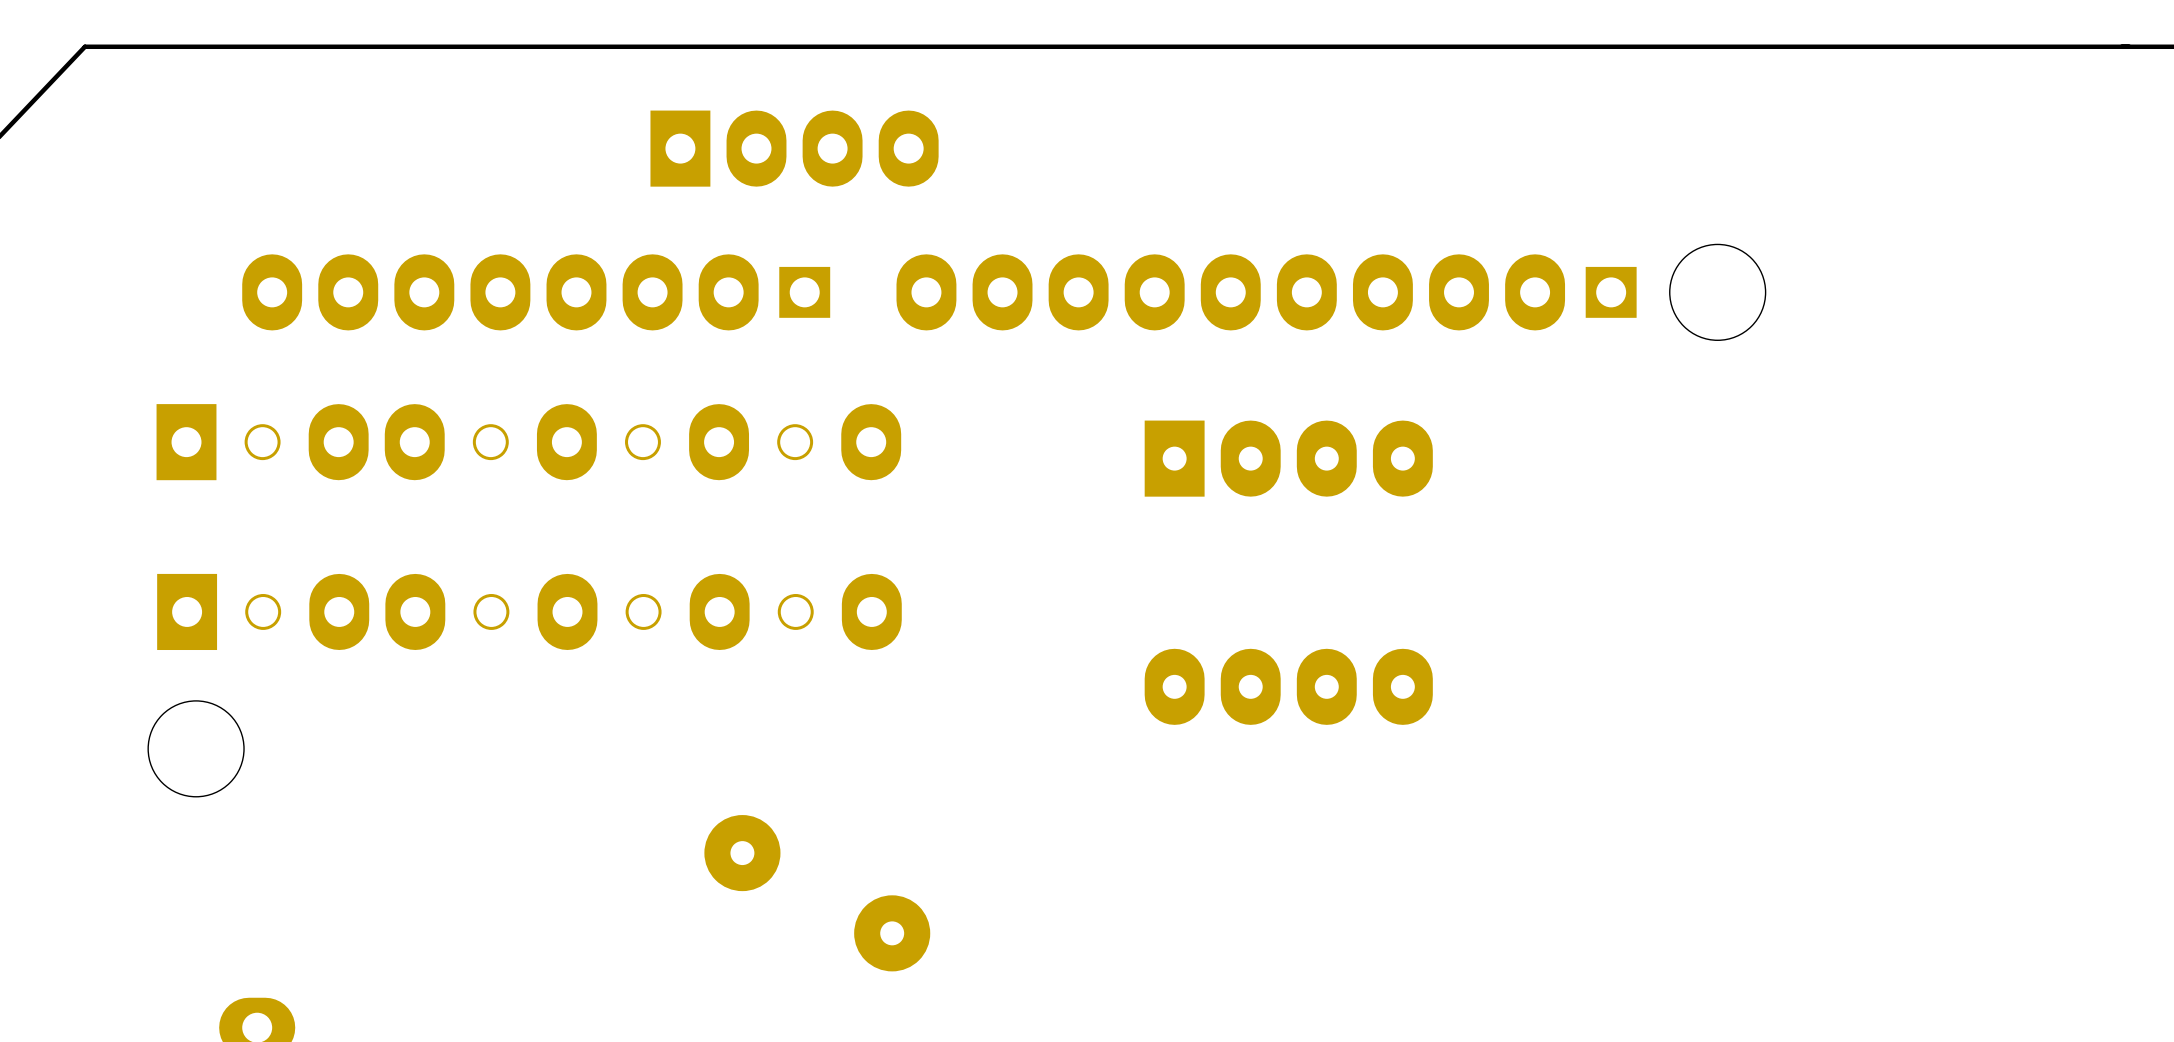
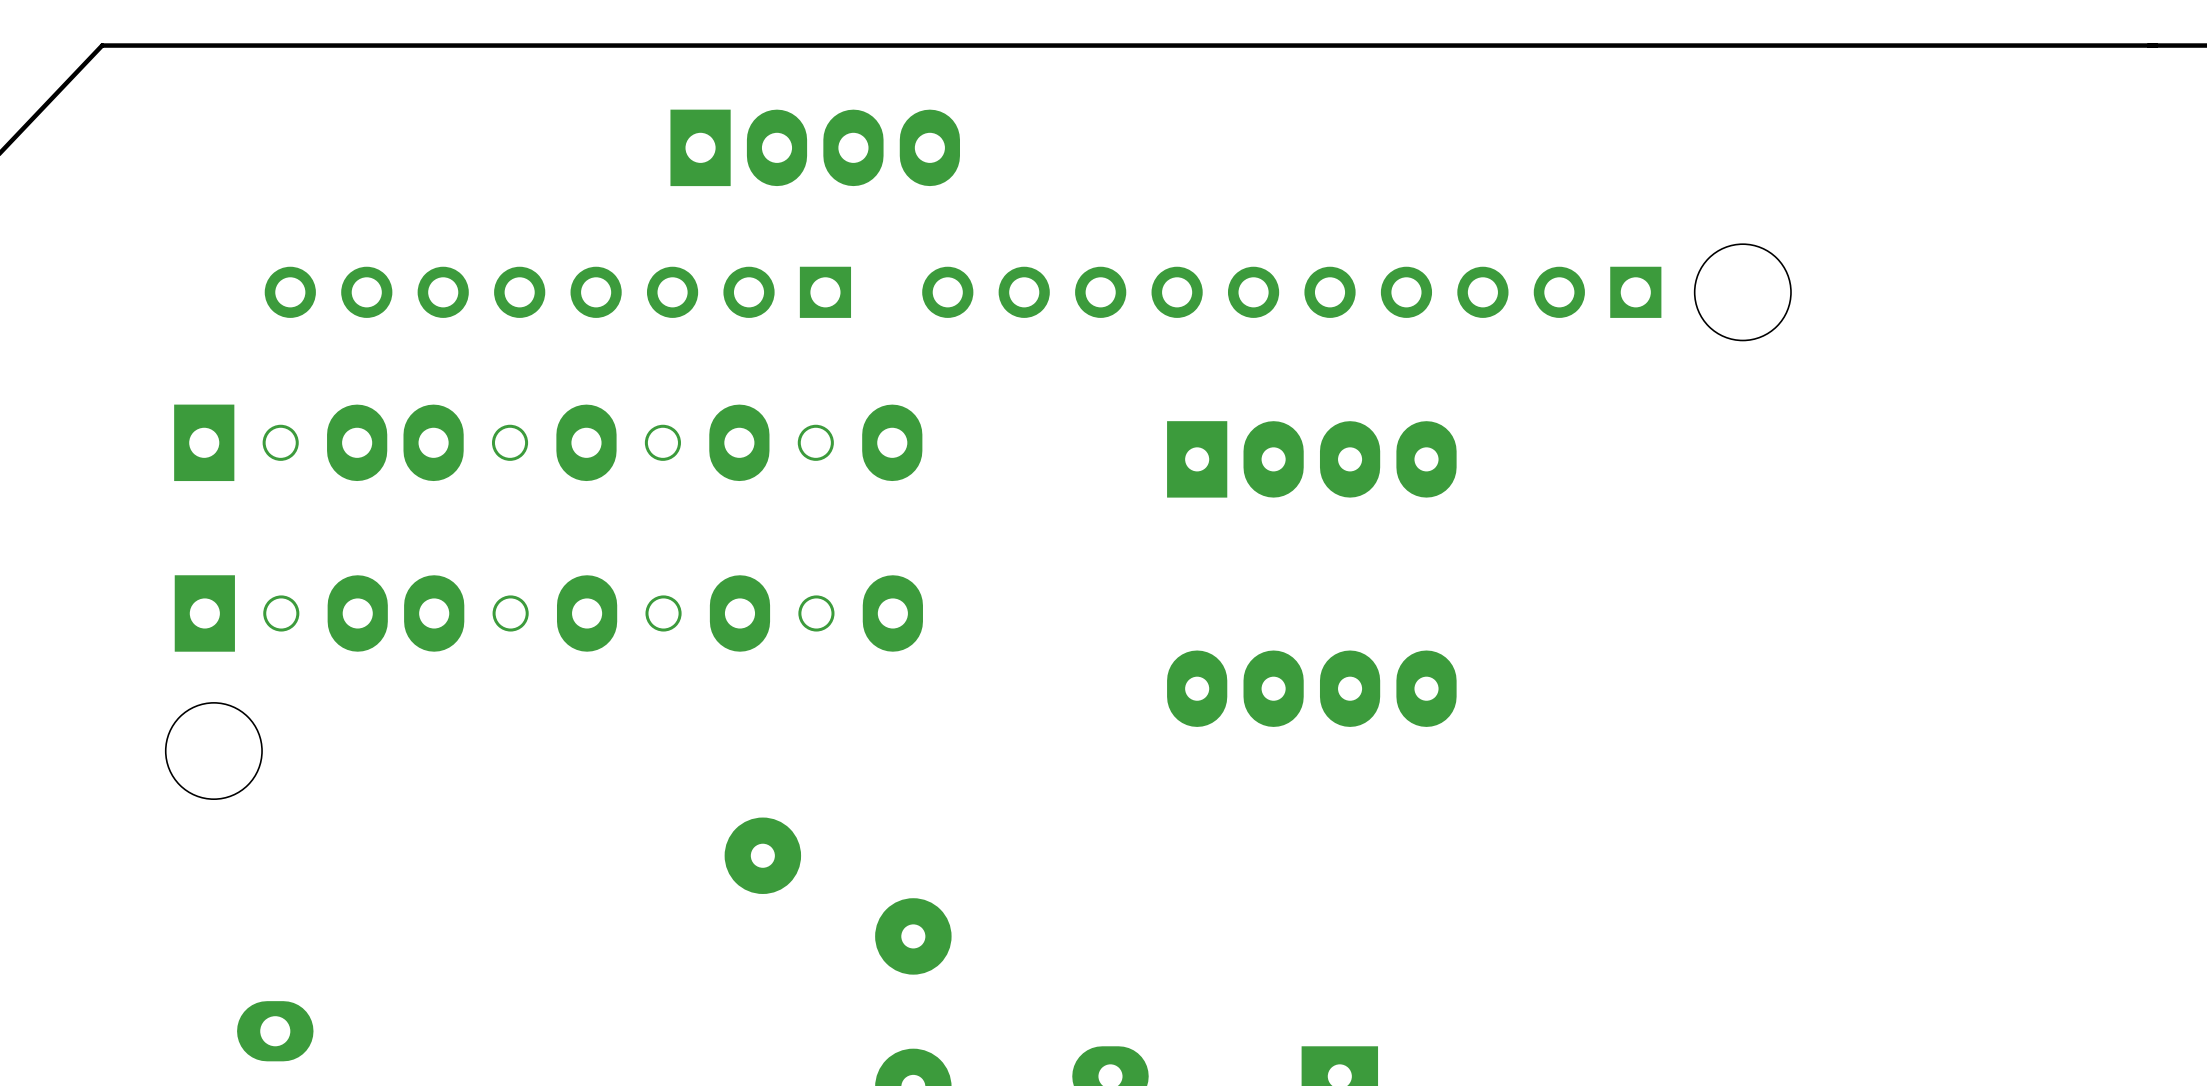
part footprint: [242, 254, 831, 331] -> [264, 266, 852, 318]
part footprint: [896, 254, 1637, 331] -> [922, 266, 1662, 318]

